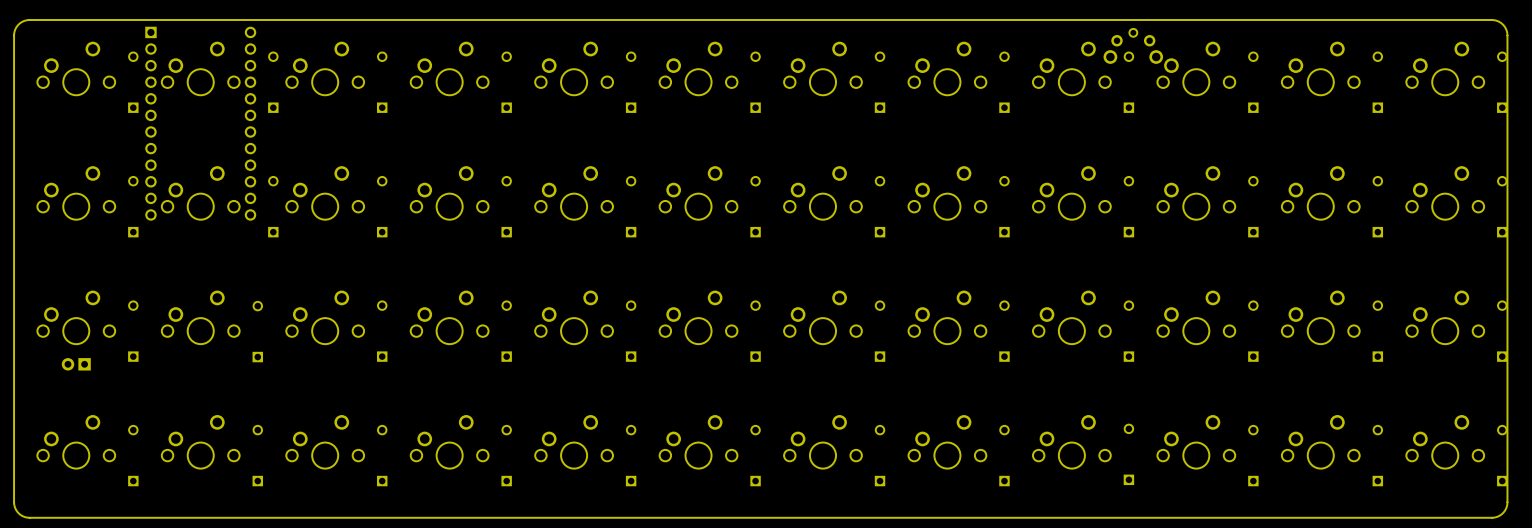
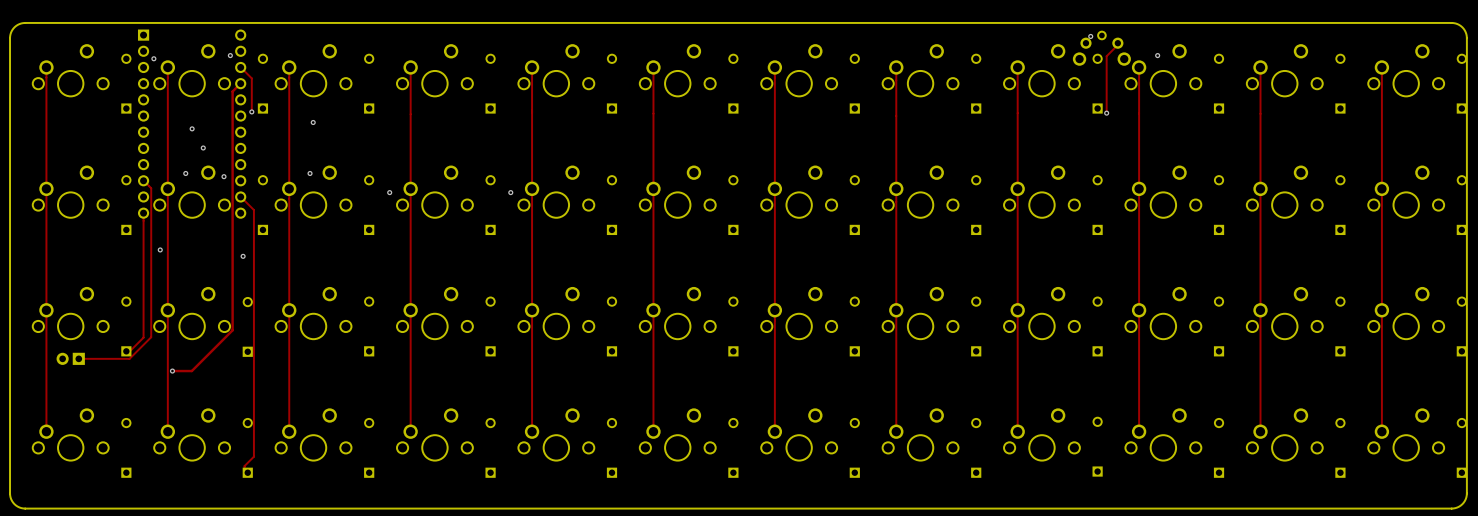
via: none -> (1090, 36)
track: none -> (1114, 47) (1106, 56) (1106, 113)
via: none -> (230, 55)
via: none -> (1157, 55)
via: none -> (153, 58)
track: none -> (46, 67) (46, 431)
track: none -> (167, 67) (167, 431)
track: none -> (240, 67) (251, 78) (251, 111)
track: none -> (289, 67) (289, 431)
track: none -> (410, 67) (410, 431)
track: none -> (532, 67) (532, 431)
track: none -> (653, 67) (653, 431)
track: none -> (774, 67) (774, 431)
track: none -> (896, 67) (896, 431)
track: none -> (1017, 67) (1017, 431)
track: none -> (1139, 67) (1139, 431)
track: none -> (1260, 67) (1260, 431)
track: none -> (1381, 67) (1381, 431)
track: none -> (240, 83) (232, 91) (232, 330) (191, 371) (172, 371)
via: none -> (251, 111)
via: none -> (1106, 113)
via: none -> (313, 122)
via: none -> (192, 128)
via: none -> (203, 147)
via: none -> (185, 173)
via: none -> (310, 173)
via: none -> (223, 176)
track: none -> (143, 180) (151, 188) (151, 337) (129, 358) (78, 358)
via: none -> (389, 192)
via: none -> (510, 192)
track: none -> (240, 196) (253, 210) (253, 456) (244, 466) (244, 472)
track: none -> (143, 212) (143, 337) (129, 351) (123, 351)
via: none -> (160, 249)
via: none -> (243, 256)
via: none -> (172, 371)

